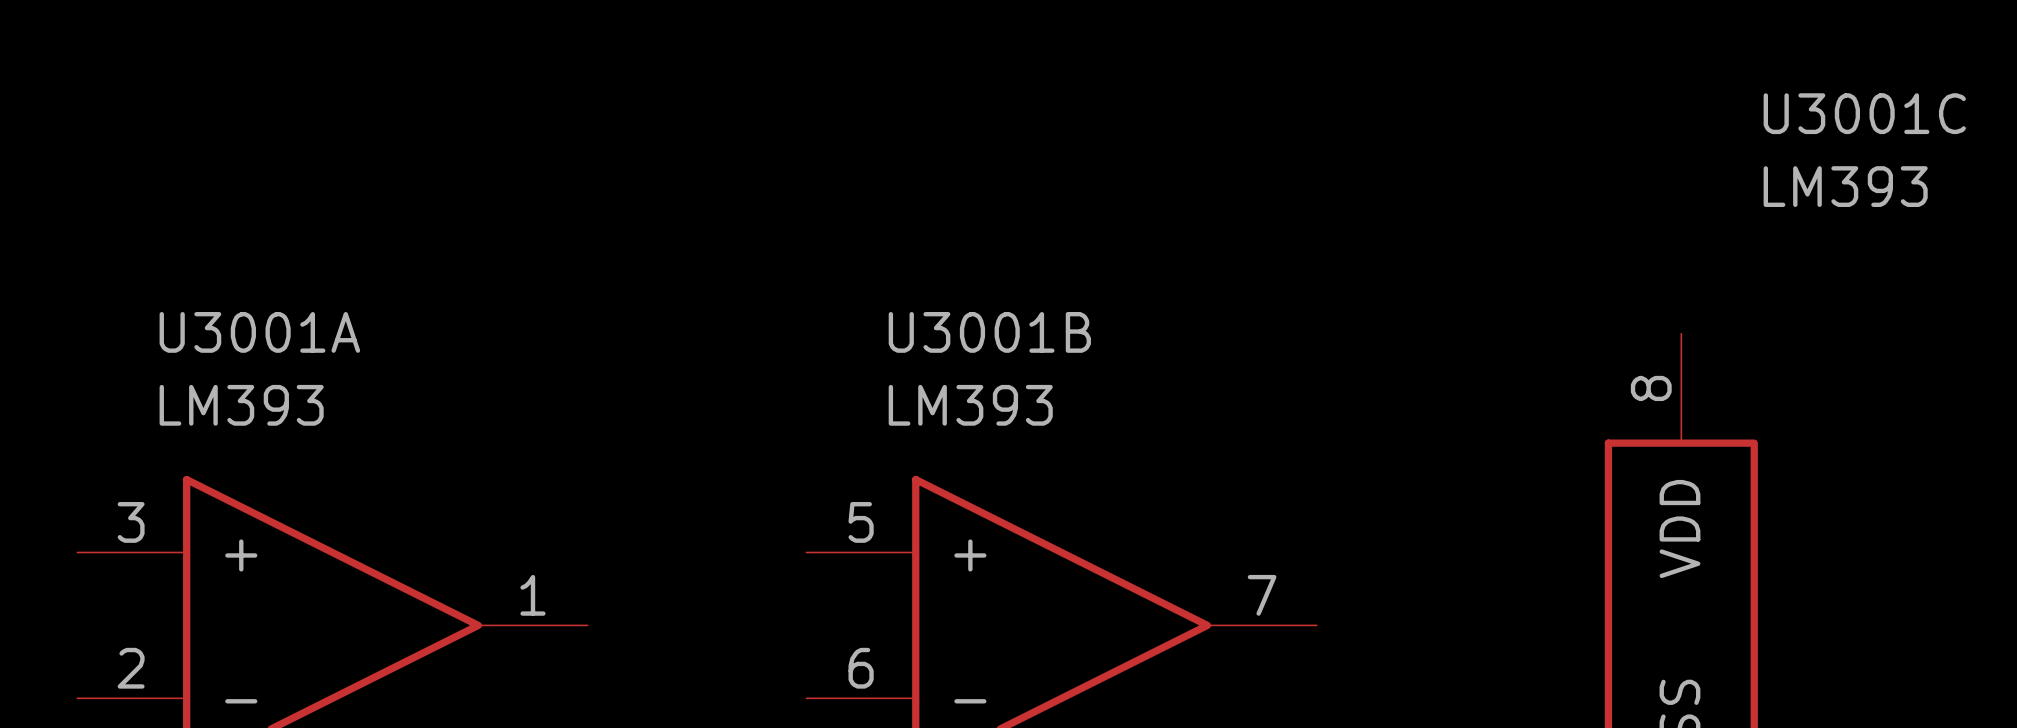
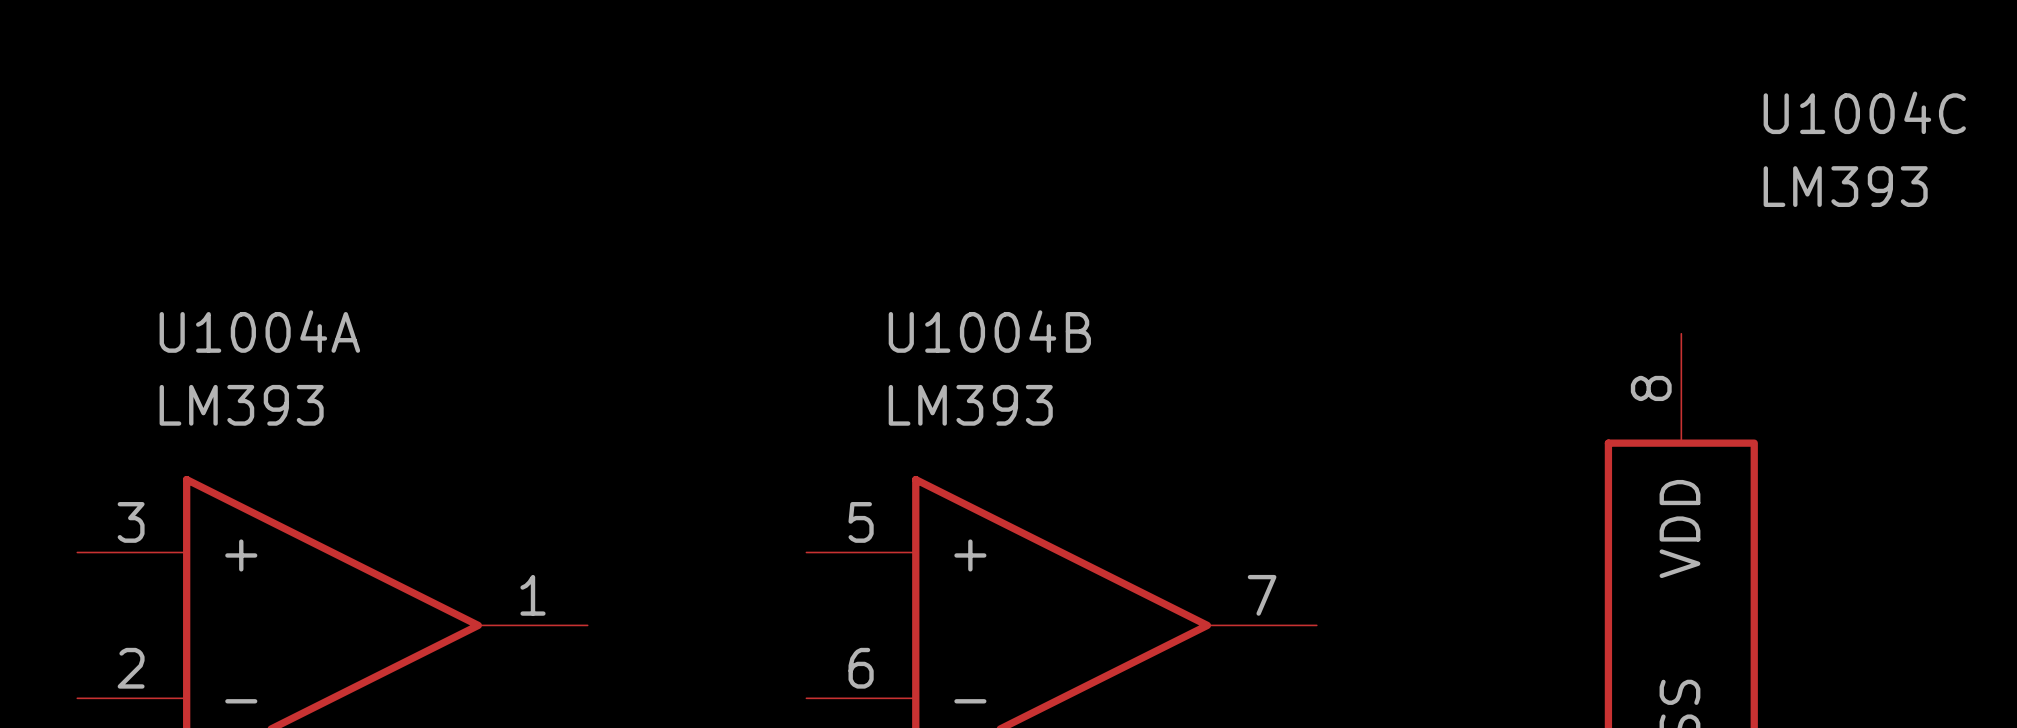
U3001C name: U3001C (1864, 113) -> U1004C (1864, 112)
U3001A name: U3001A (259, 332) -> U1004A (259, 331)
U3001B name: U3001B (989, 332) -> U1004B (989, 331)

